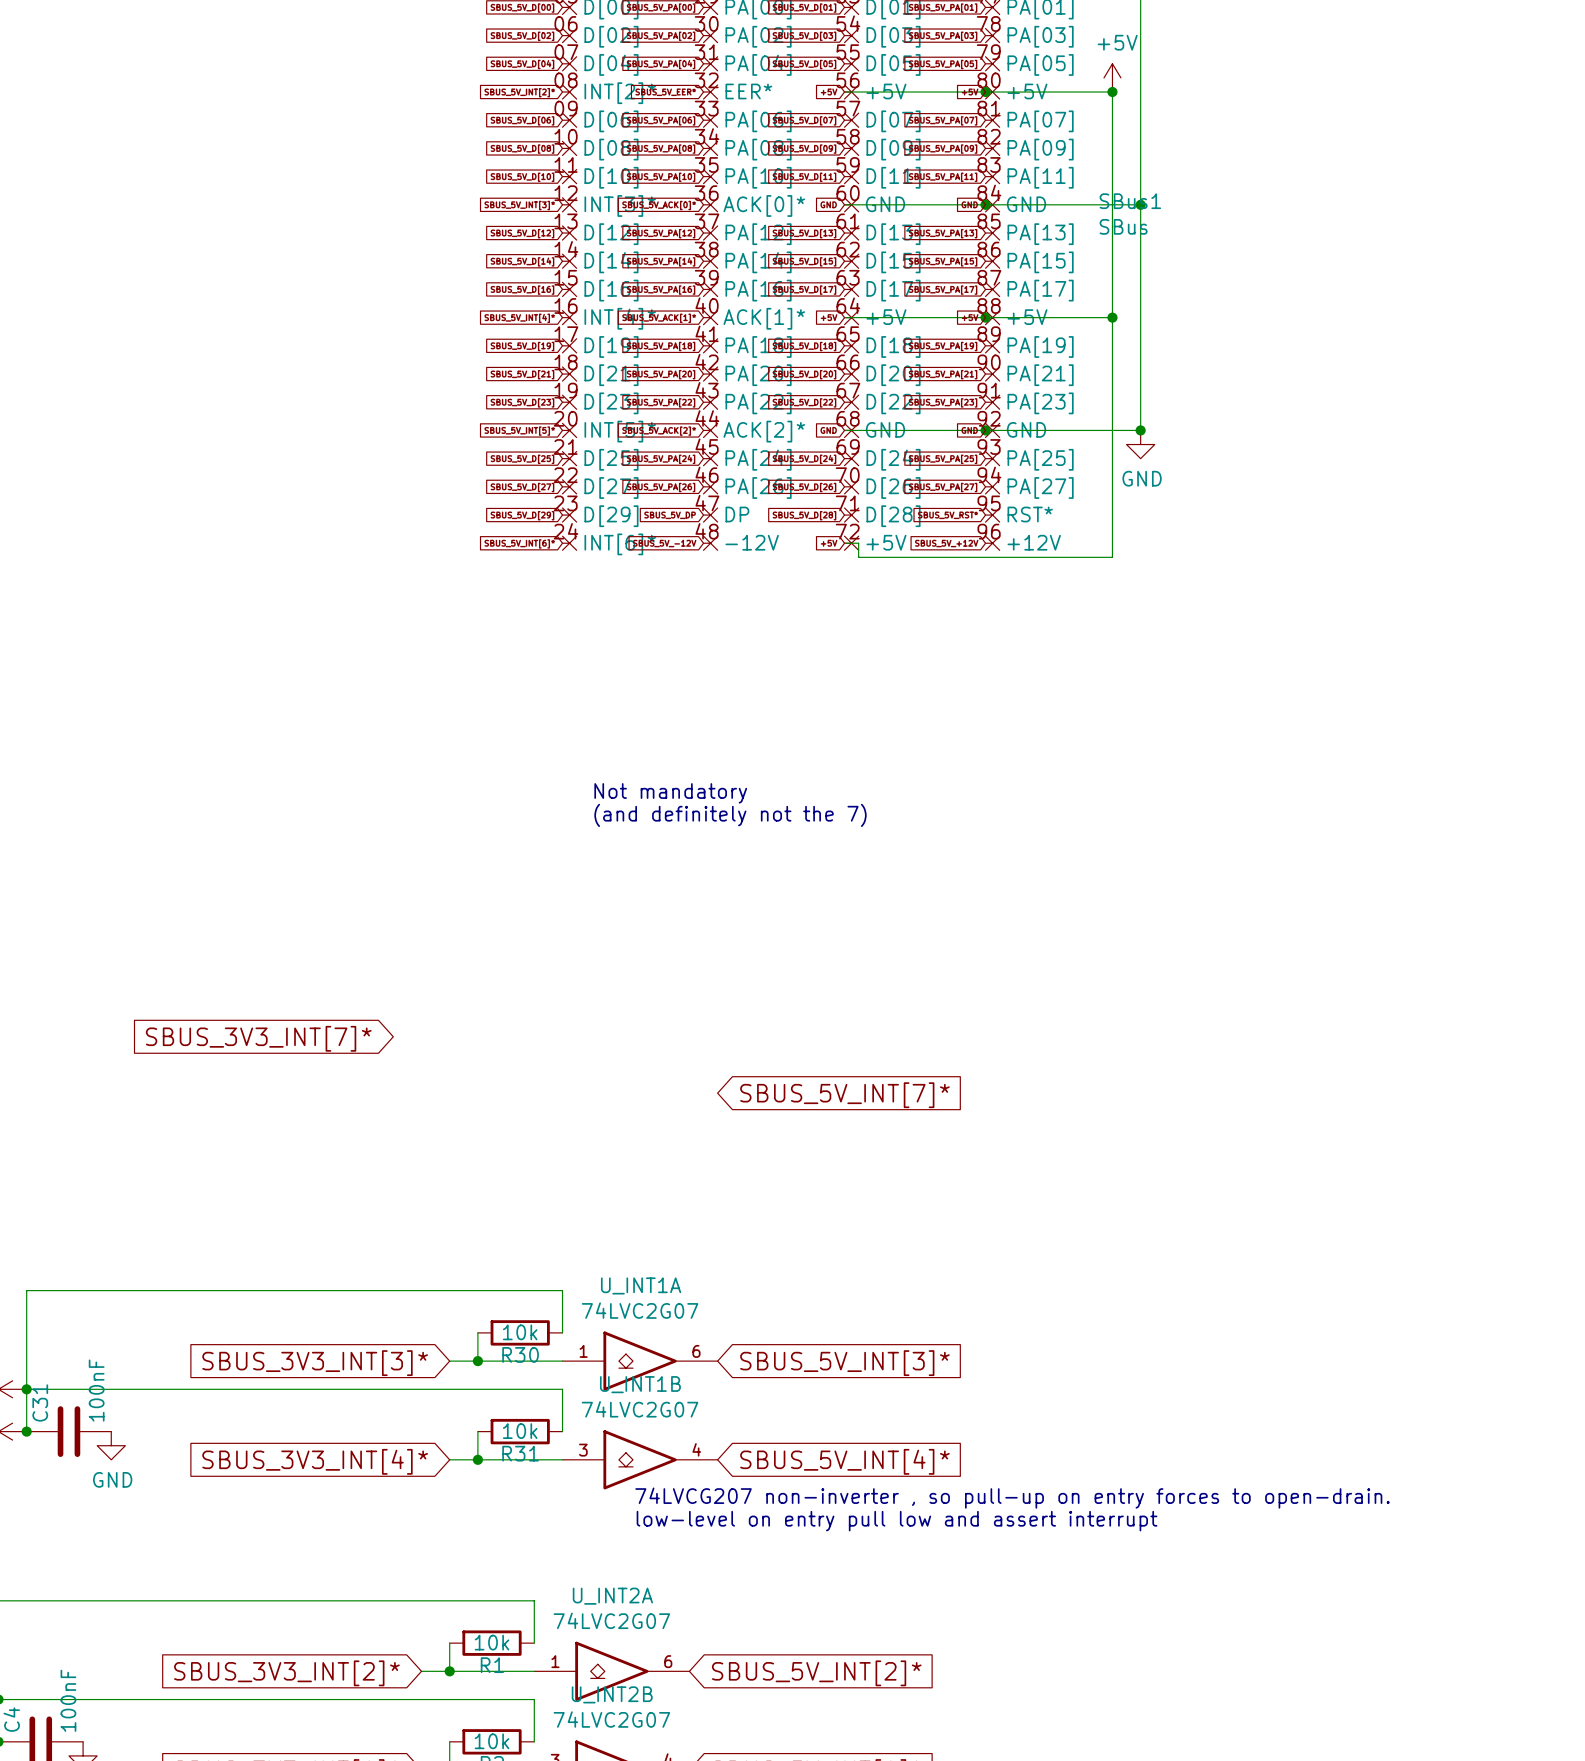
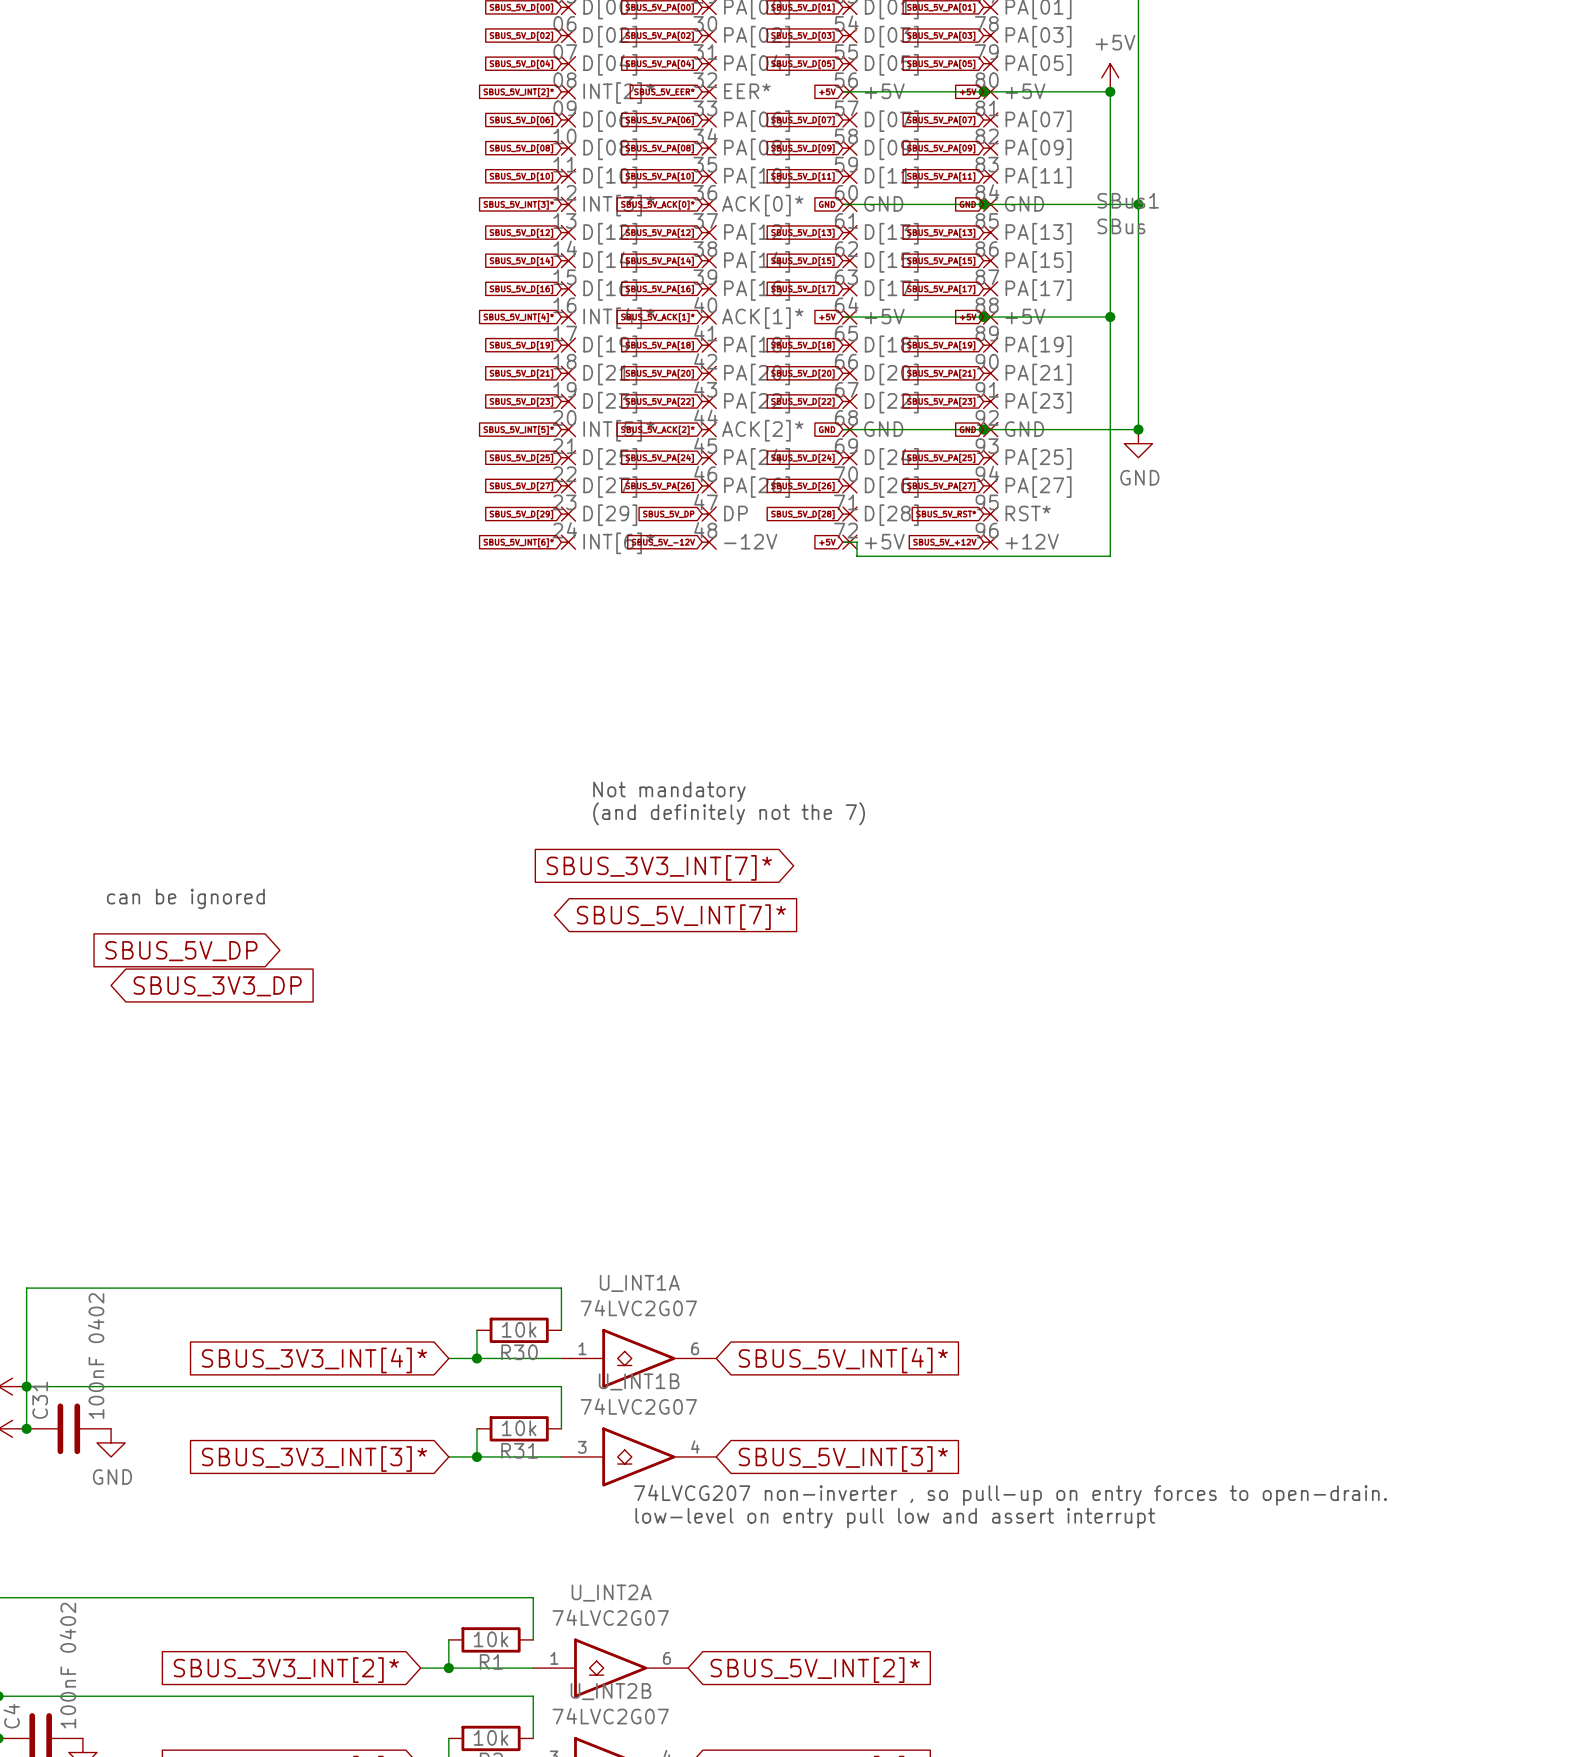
global label: none -> SBUS_3V3_INT[7]* (659, 867)
text: none -> can be ignored (185, 898)
global label: none -> SBUS_5V_DP (181, 951)
global label: none -> SBUS_3V3_DP (217, 986)
global label: SBUS_3V3_INT[7]* (258, 1038) -> none
global label position: SBUS_5V_INT[7]* (844, 1095) -> SBUS_5V_INT[7]* (681, 917)
global label: SBUS_3V3_INT[3]* (315, 1363) -> SBUS_3V3_INT[4]* (314, 1360)
global label: SBUS_5V_INT[3]* (844, 1363) -> SBUS_5V_INT[4]* (843, 1360)
C31 value: 100nF (96, 1390) -> 100nF 0402 (96, 1356)
global label: SBUS_3V3_INT[4]* (315, 1461) -> SBUS_3V3_INT[3]* (314, 1458)
global label: SBUS_5V_INT[4]* (844, 1461) -> SBUS_5V_INT[3]* (843, 1458)
C4 value: 100nF (68, 1700) -> 100nF 0402 (67, 1665)

